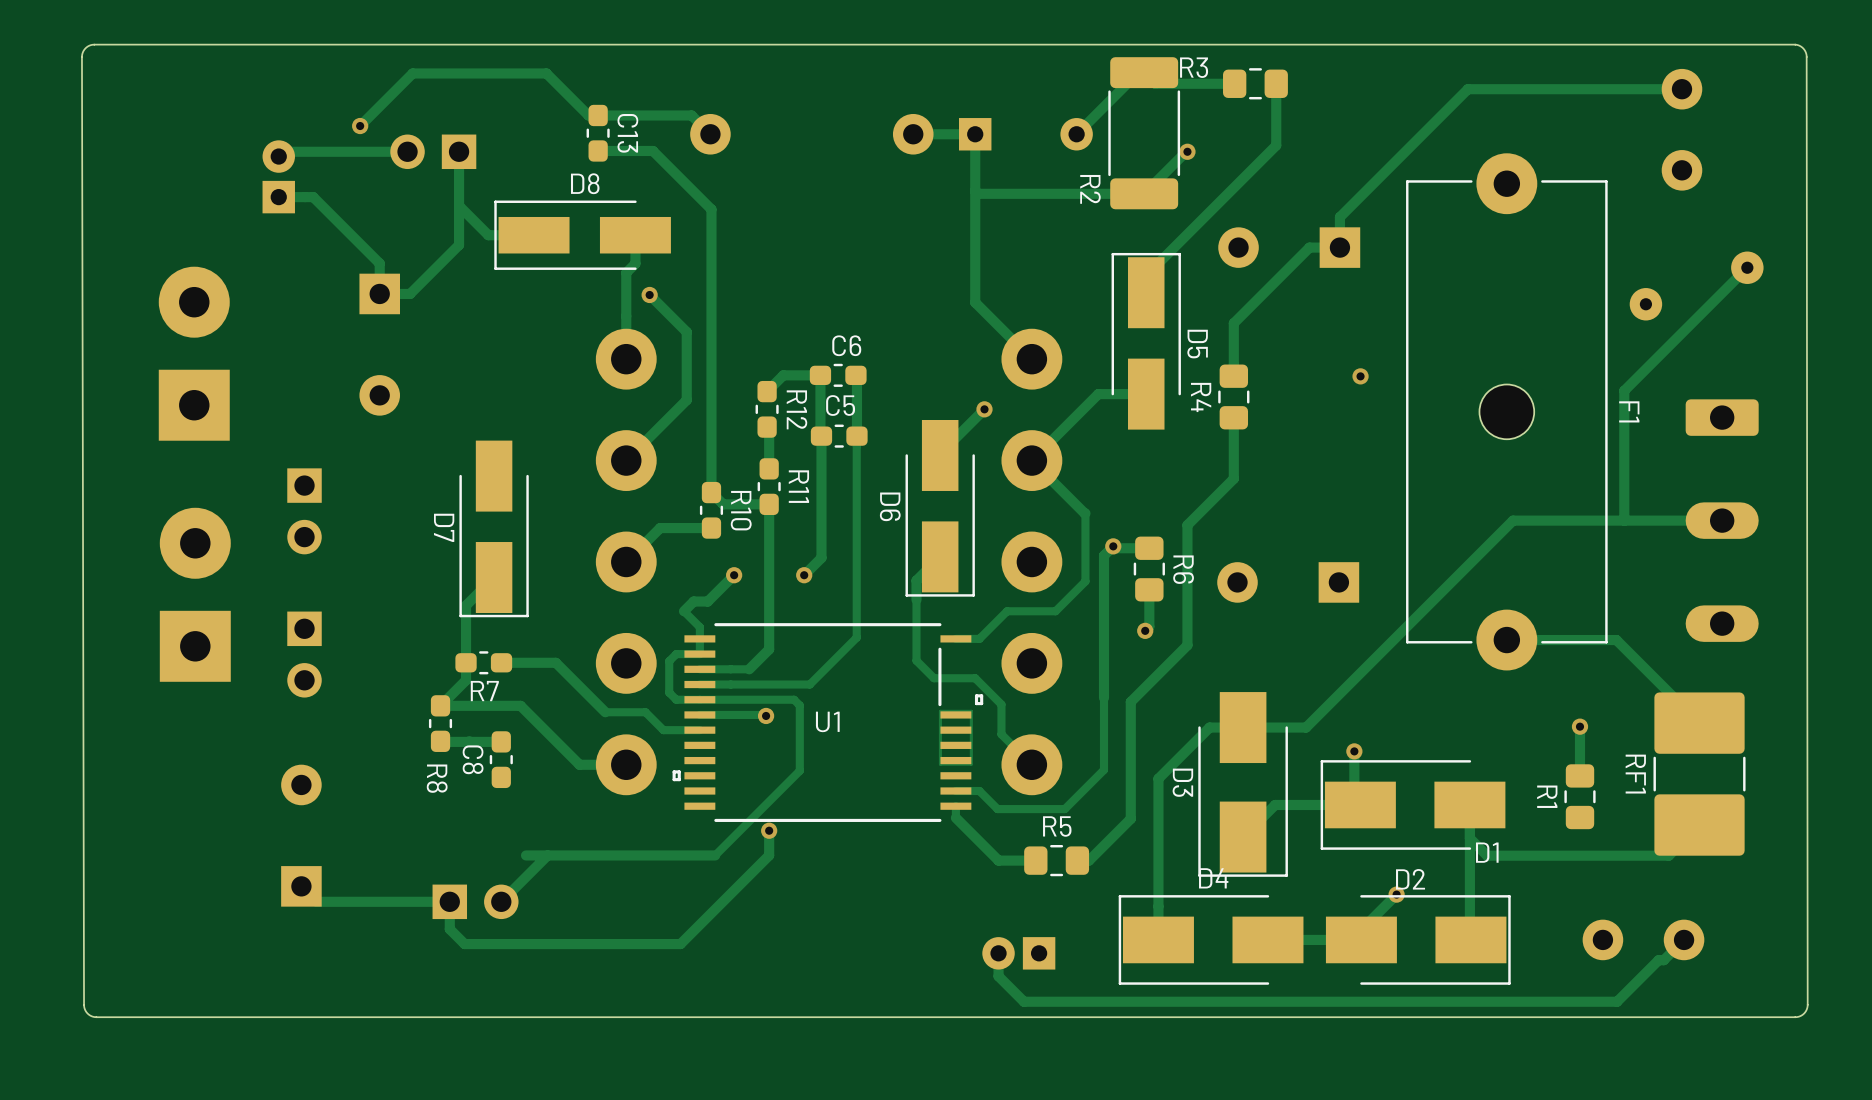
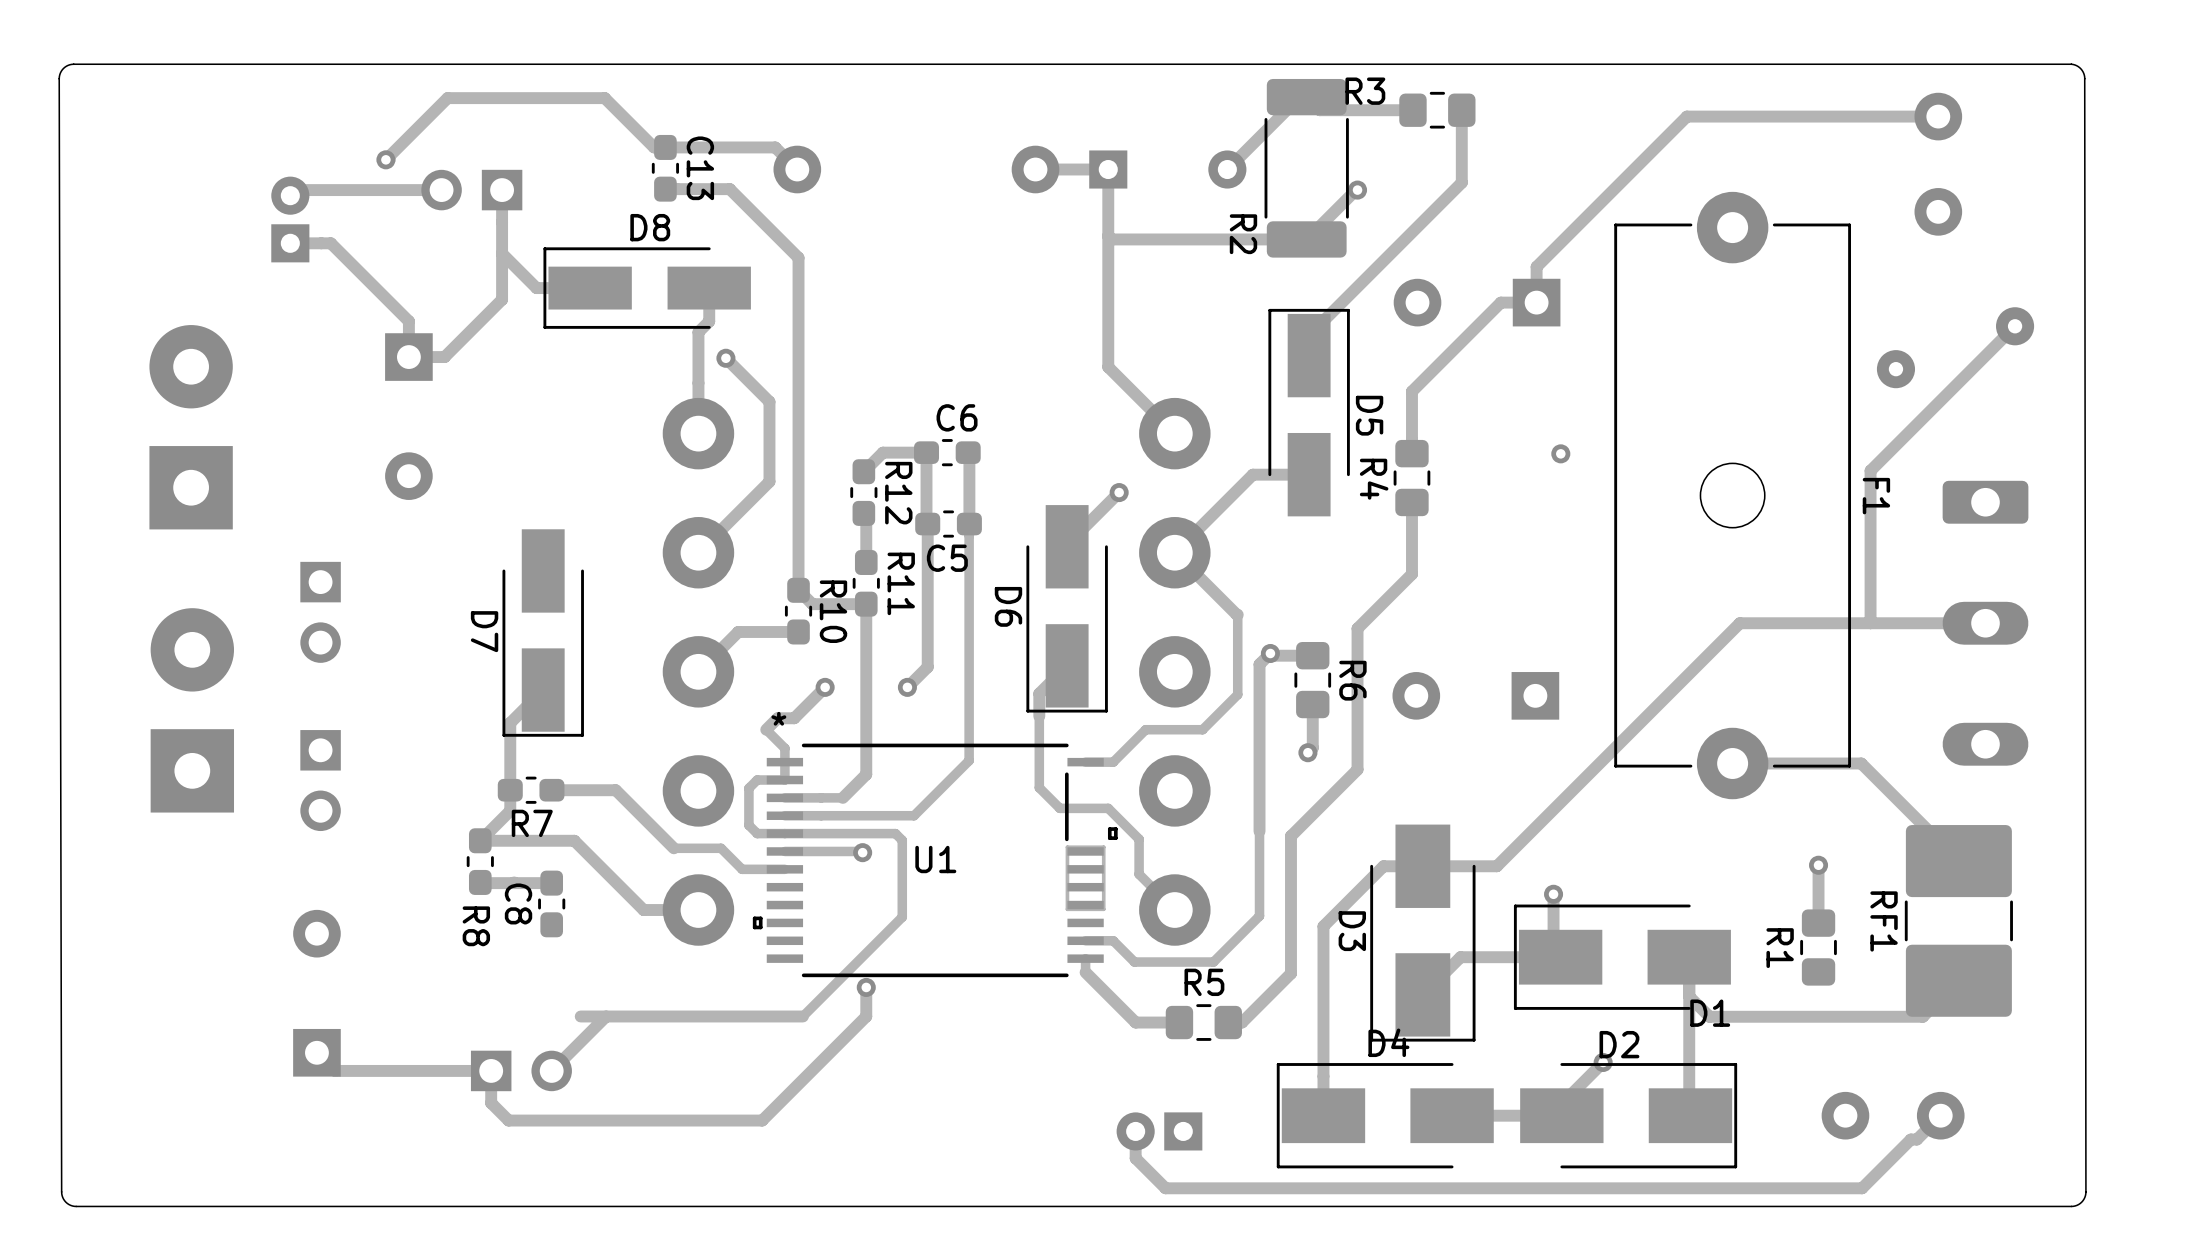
C5 name position: C5 (840, 405) -> C5 (947, 558)
U1 text: none -> * (778, 718)

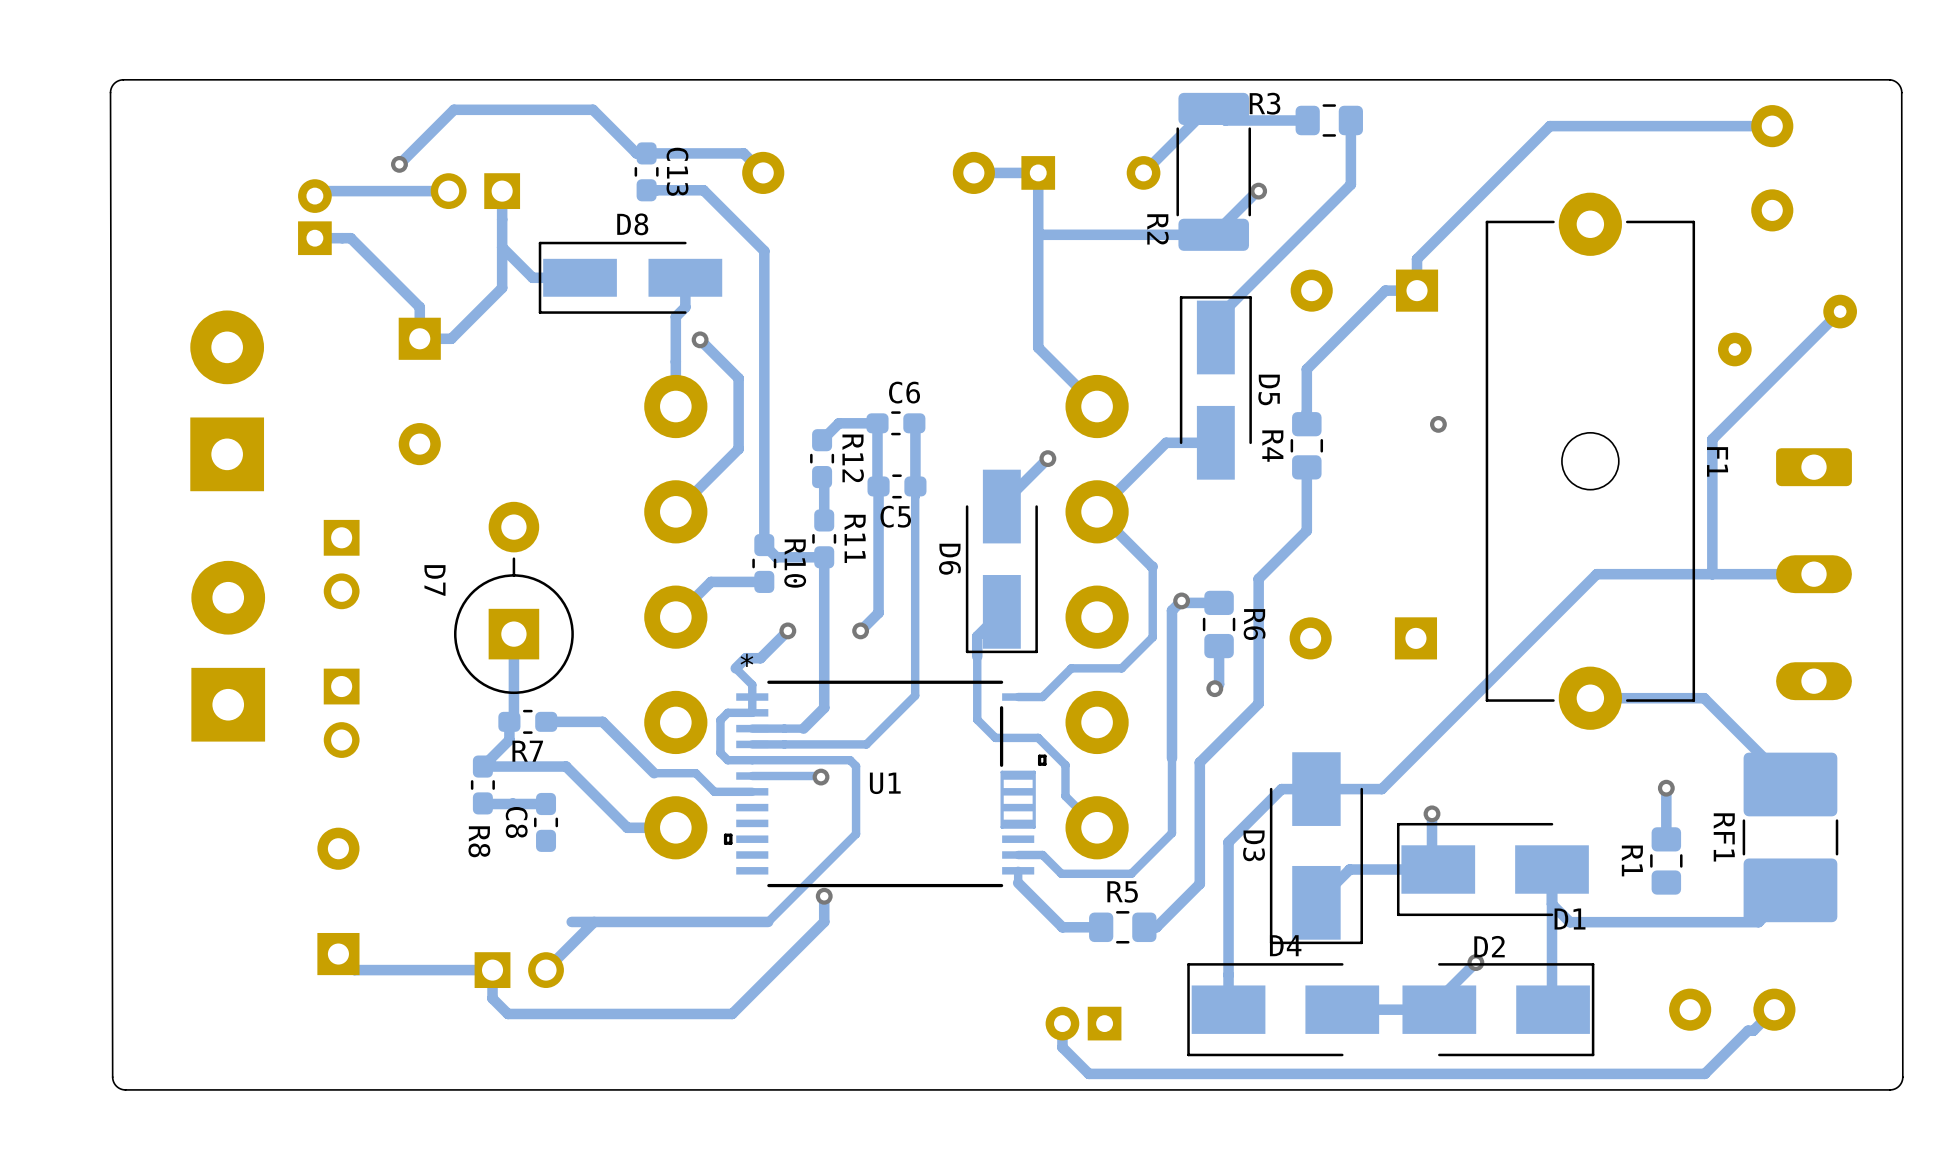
D7 footprint: [502, 529, 584, 737] -> [454, 501, 574, 695]
track: (543, 690) (510, 722) (510, 790) -> none
track: none -> (513, 634) (513, 717)

